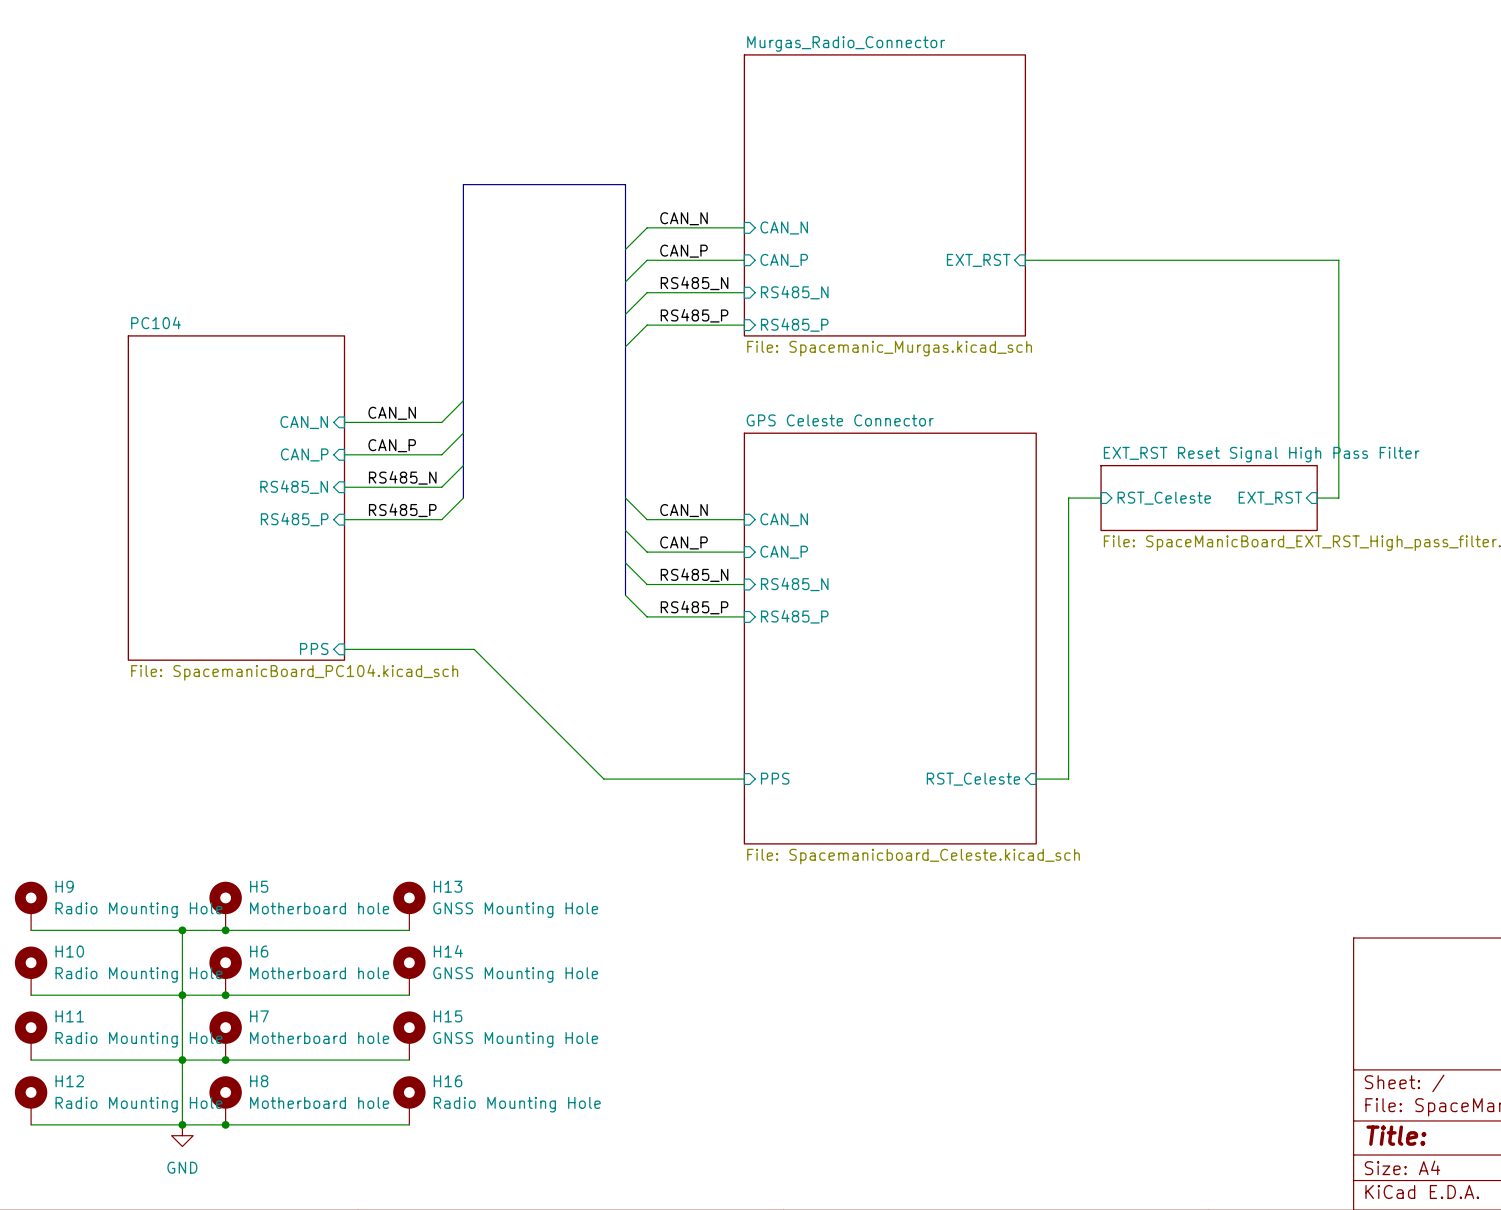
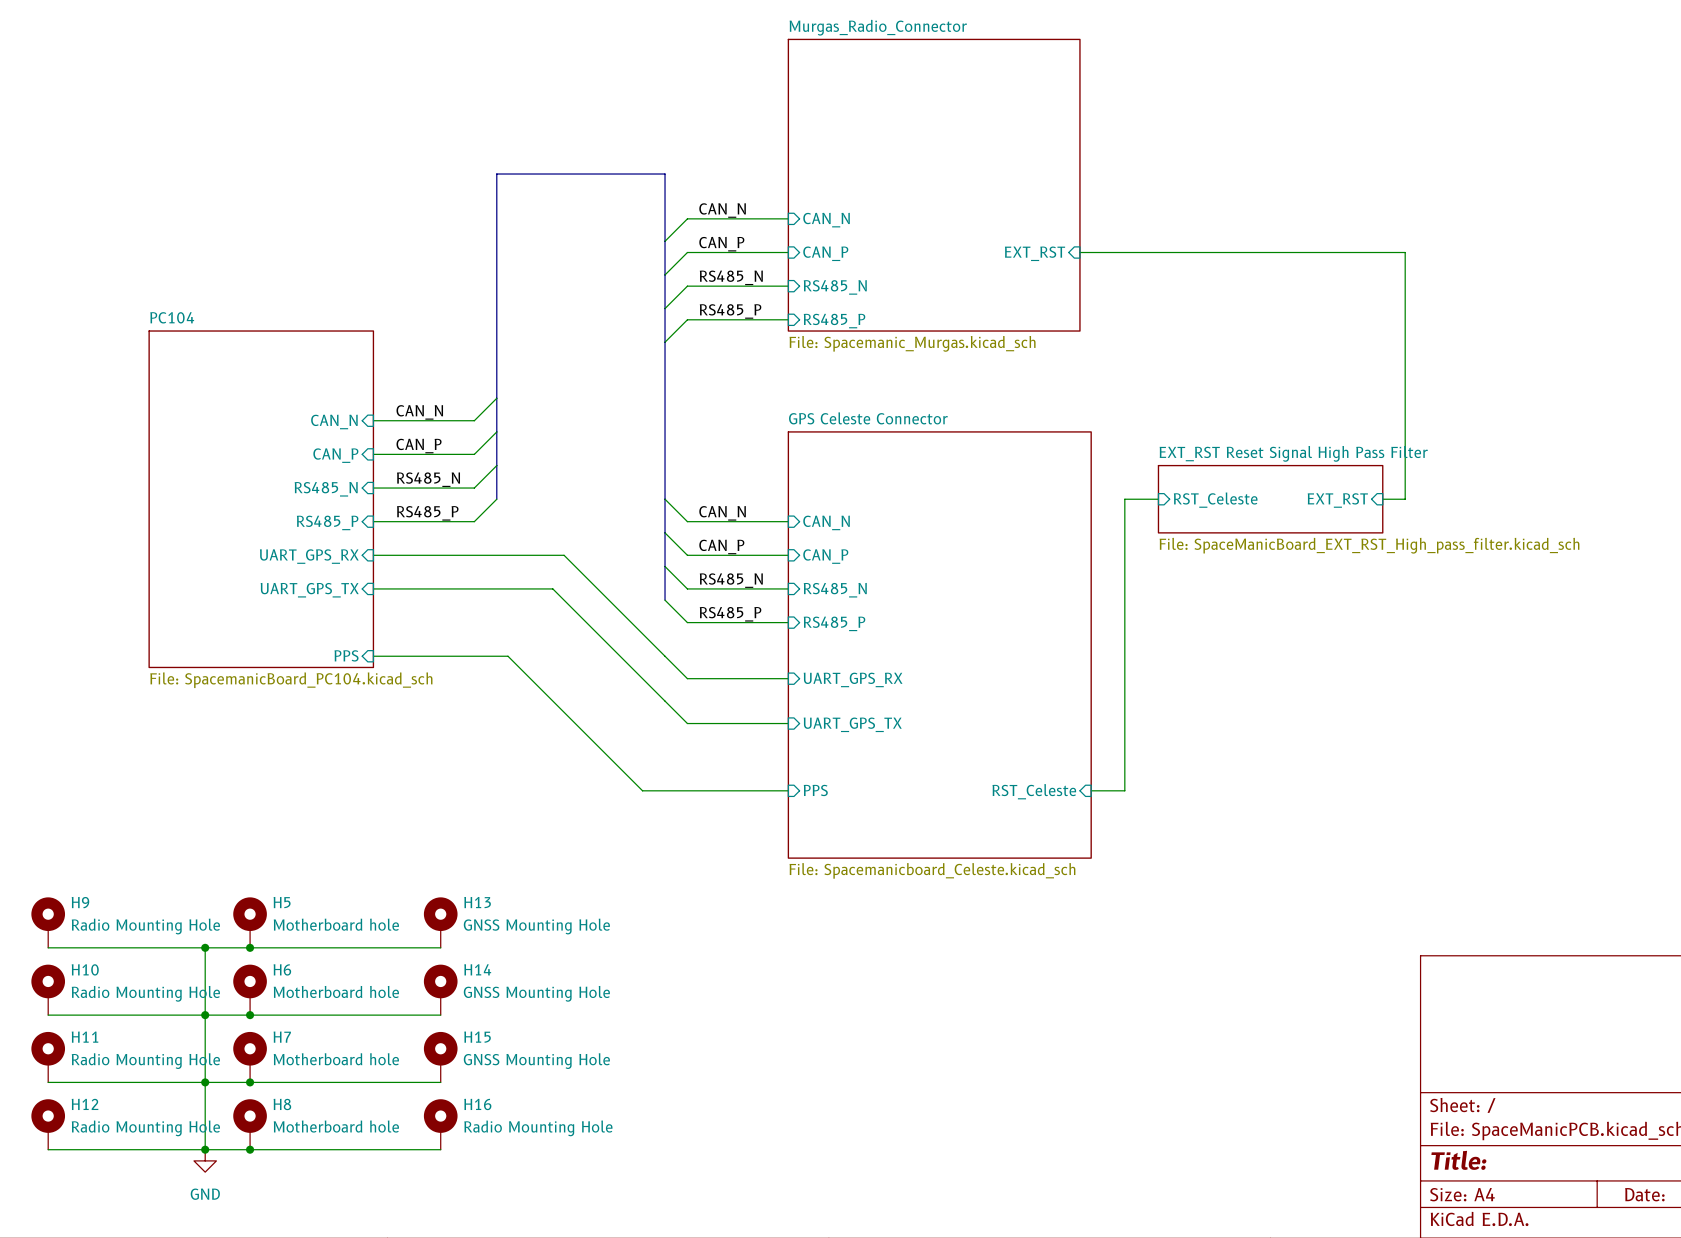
sheet pin: none -> UART_GPS_RX (309, 556)
wire: none -> (373, 555) (564, 555) (687, 678) (788, 678)
sheet pin: none -> UART_GPS_TX (309, 590)
wire: none -> (373, 588) (552, 588) (687, 723) (788, 723)
sheet pin: none -> UART_GPS_RX (853, 679)
sheet pin: none -> UART_GPS_TX (852, 724)

